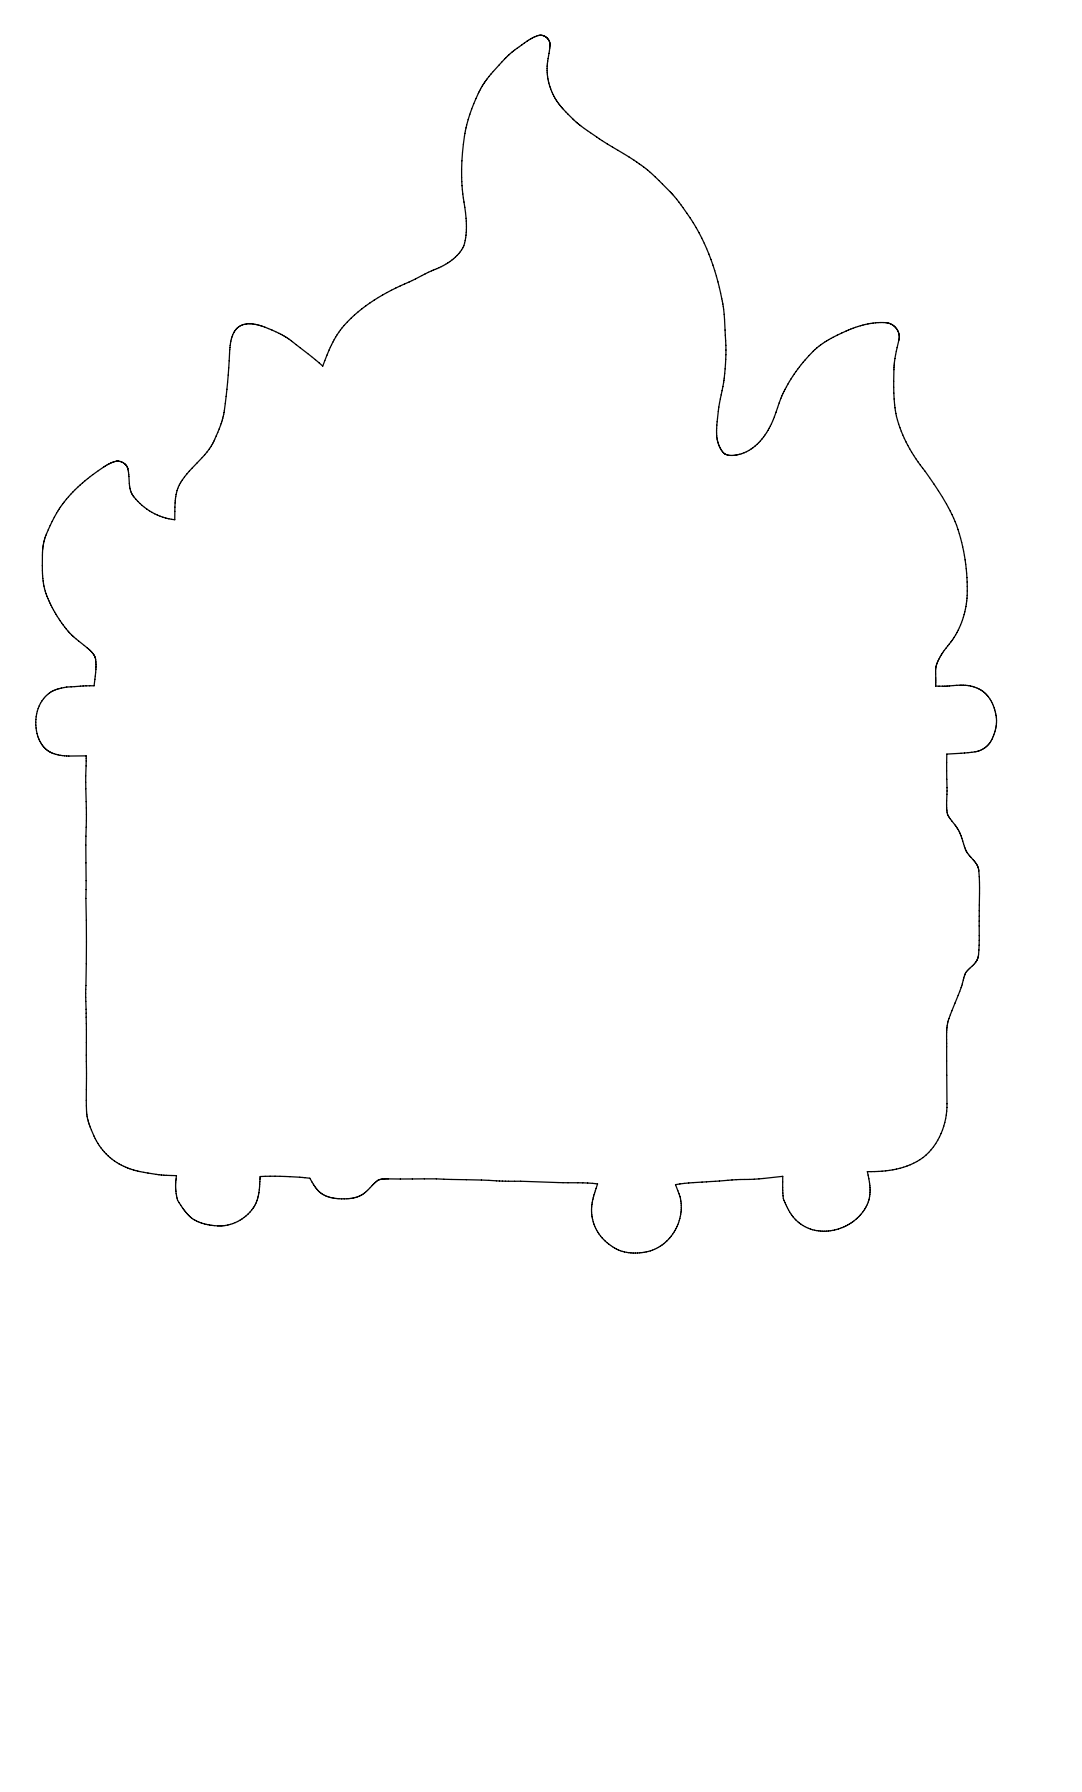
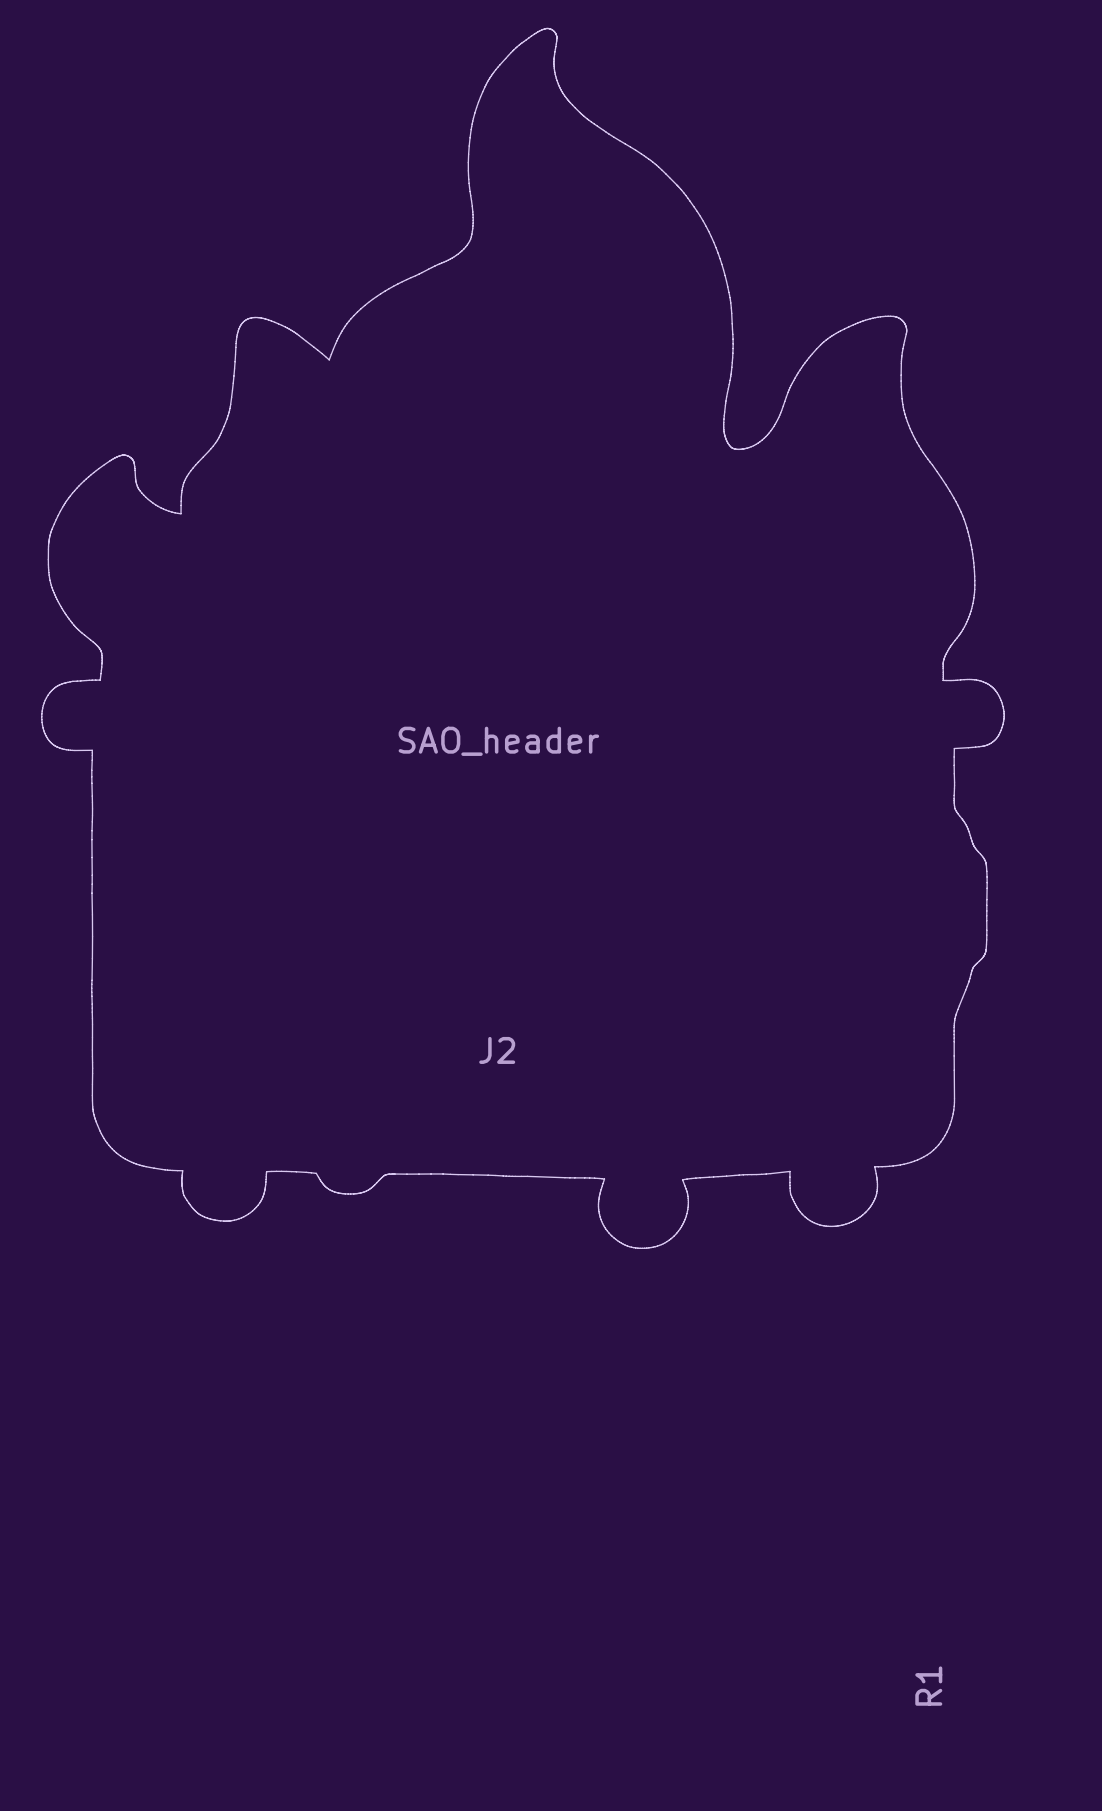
J2: none -> SAO_header (498, 895)
R1: none -> (928, 1686)

